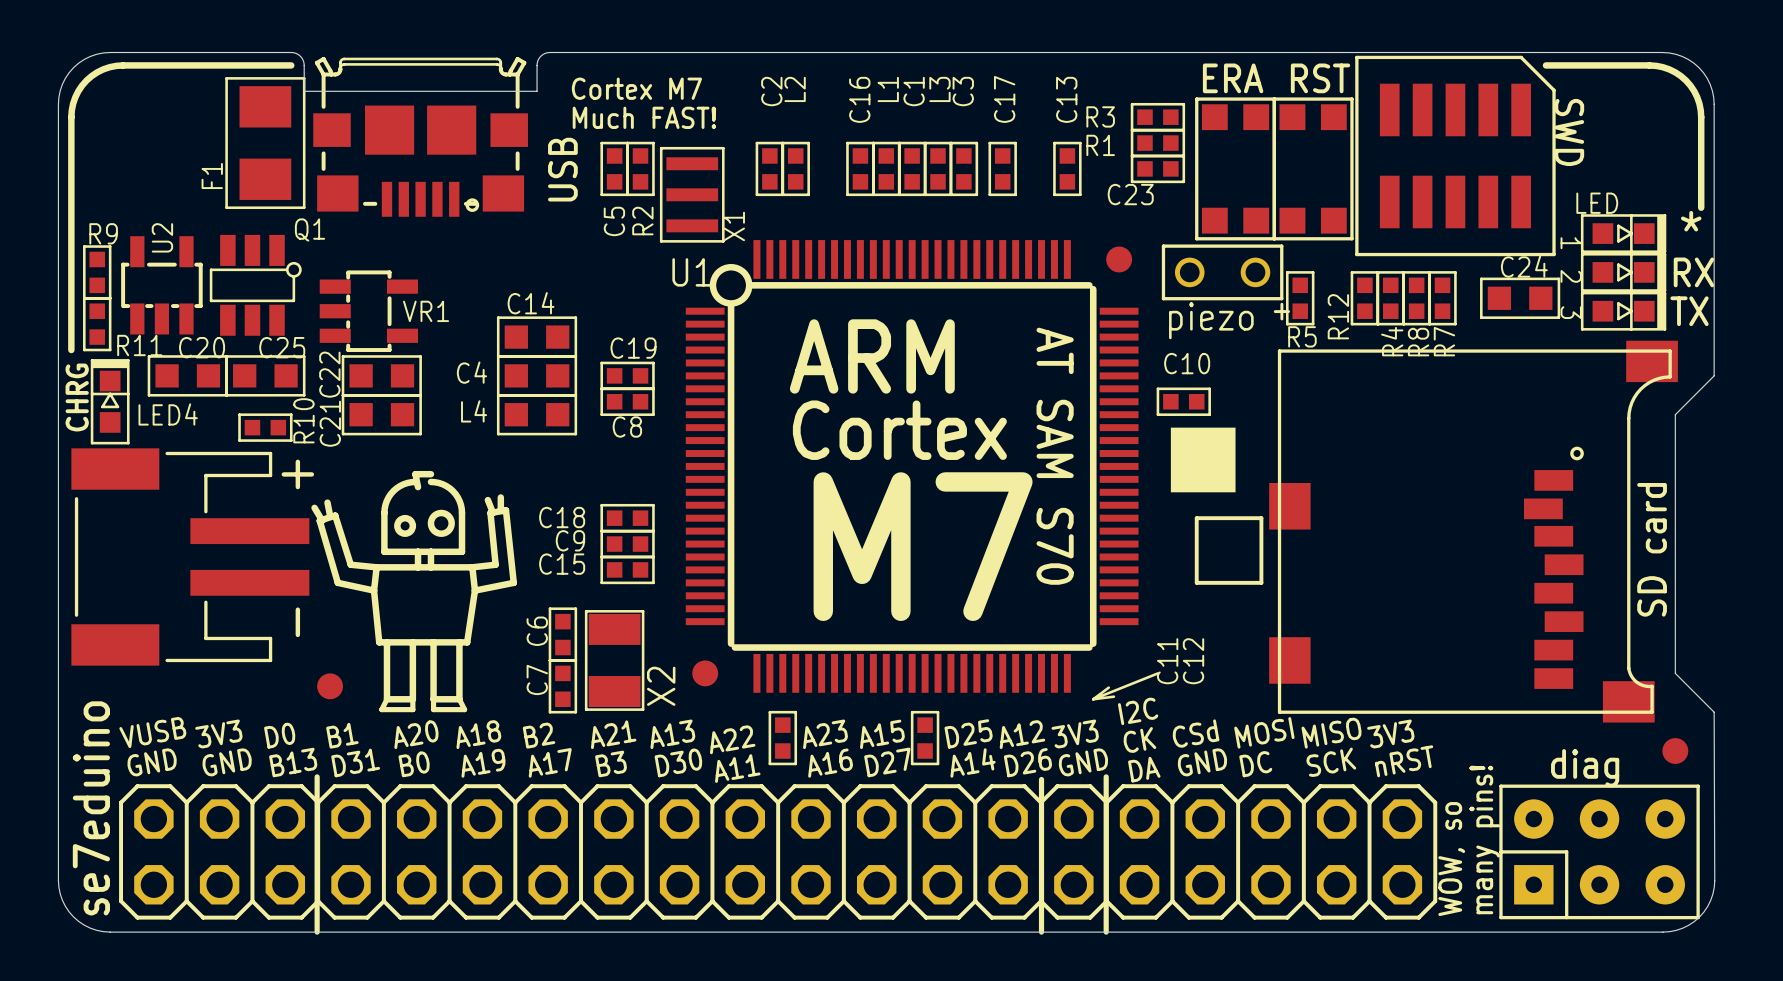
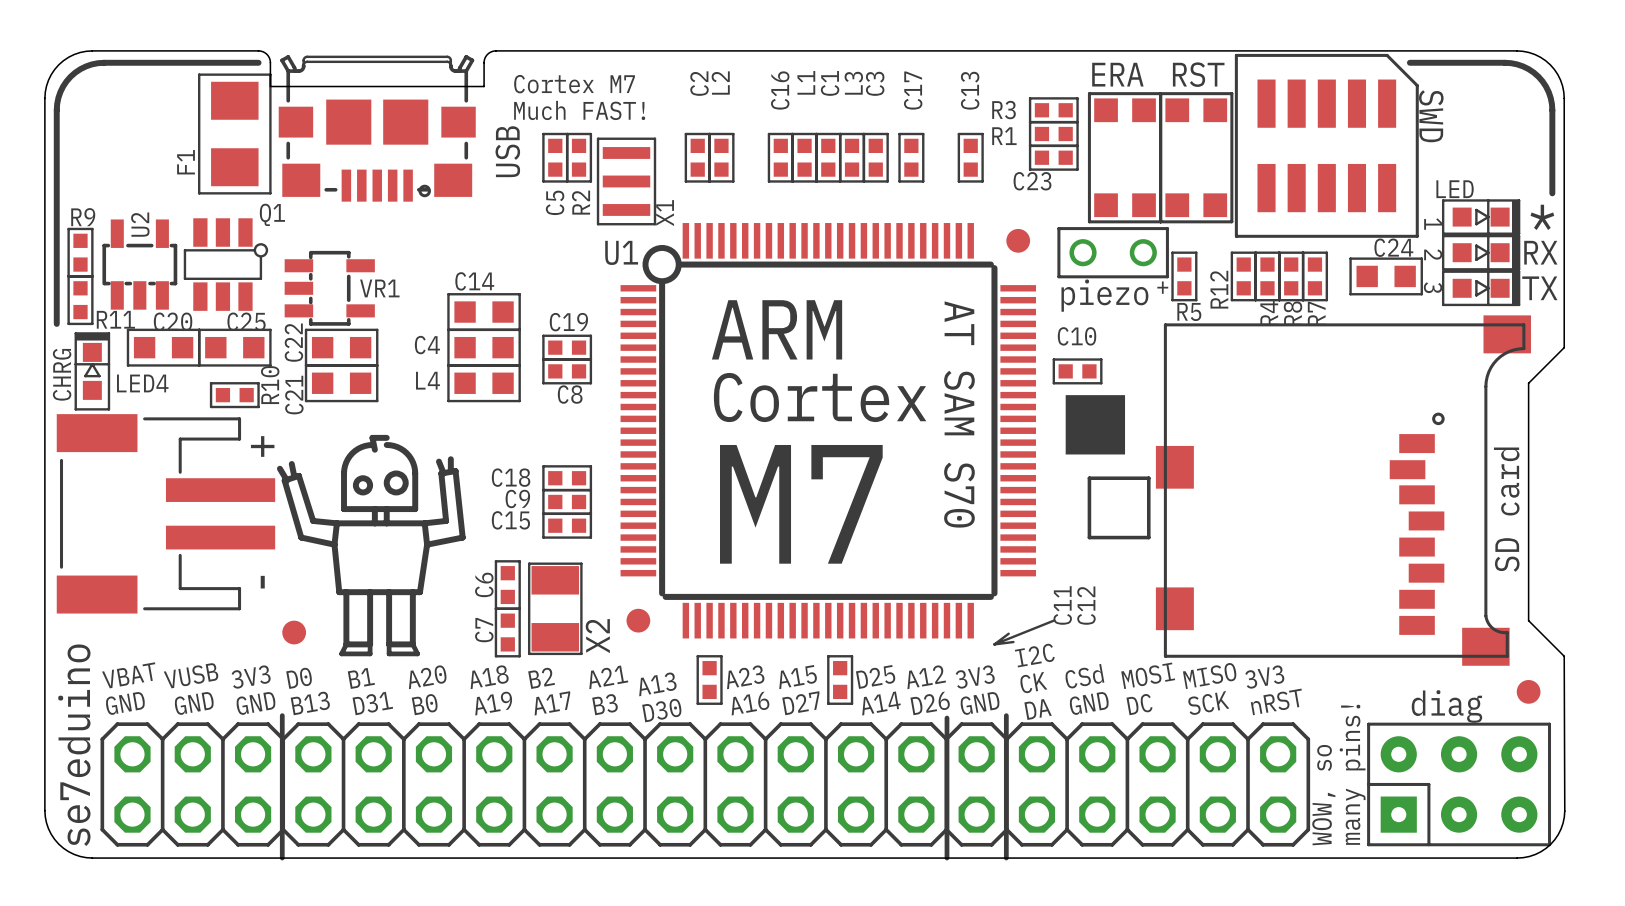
text: none -> VBAT (128, 675)
text position: VUSB (152, 732) -> VUSB (191, 675)
text: 3V3 (218, 734) -> none
text: A20 (416, 734) -> B1 (361, 678)
text: A18 (478, 734) -> A20 (427, 677)
text: A21 (613, 734) -> B2 (541, 678)
text: A13 (672, 734) -> A21 (608, 677)
text: D0 (279, 735) -> 3V3 (251, 677)
text: B1 (342, 735) -> D0 (299, 678)
text: B2 (539, 735) -> A18 (489, 677)
text: A22 (732, 739) -> A13 (657, 684)
text: B13 (293, 762) -> GND (255, 703)
text: D31 (355, 762) -> B13 (310, 703)
text: A17 (550, 762) -> A19 (493, 703)
text: D30 (678, 762) -> B3 (605, 704)
text: A19 (483, 763) -> B0 (424, 704)
text: B3 (611, 763) -> A17 (552, 703)
text: B0 (414, 764) -> D31 (372, 703)
text: A11 (737, 768) -> D30 (661, 710)

